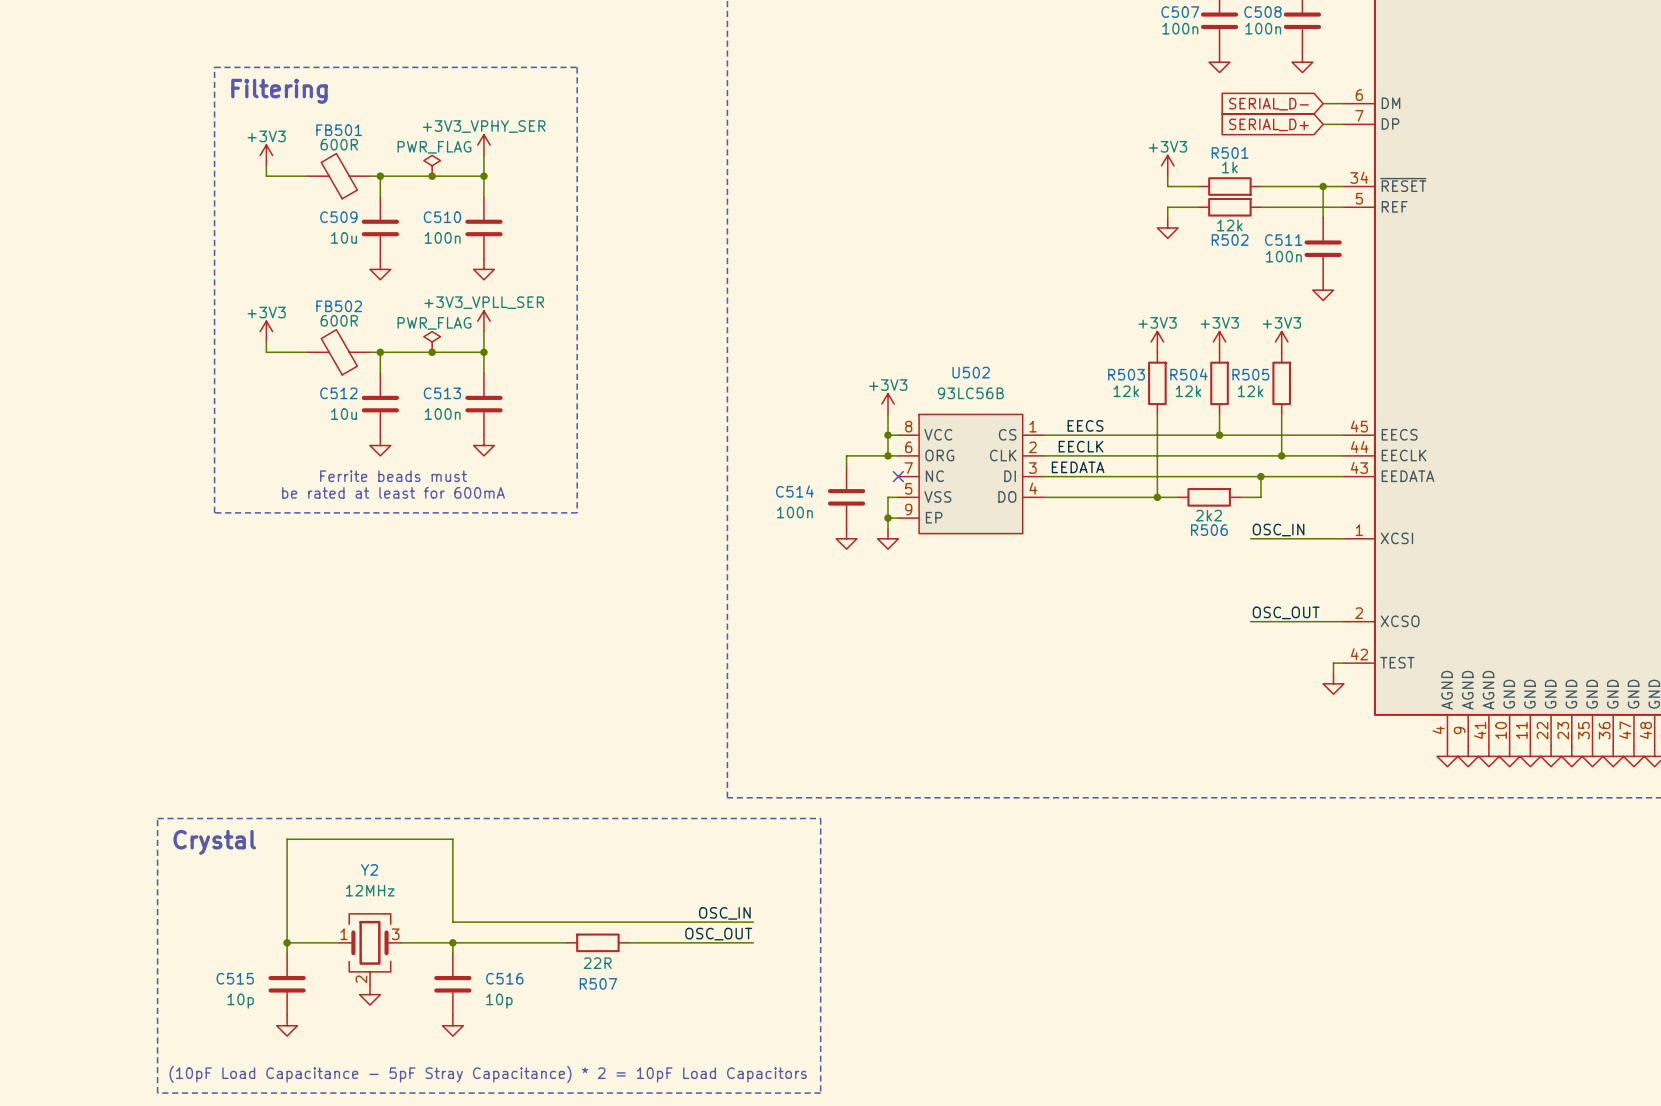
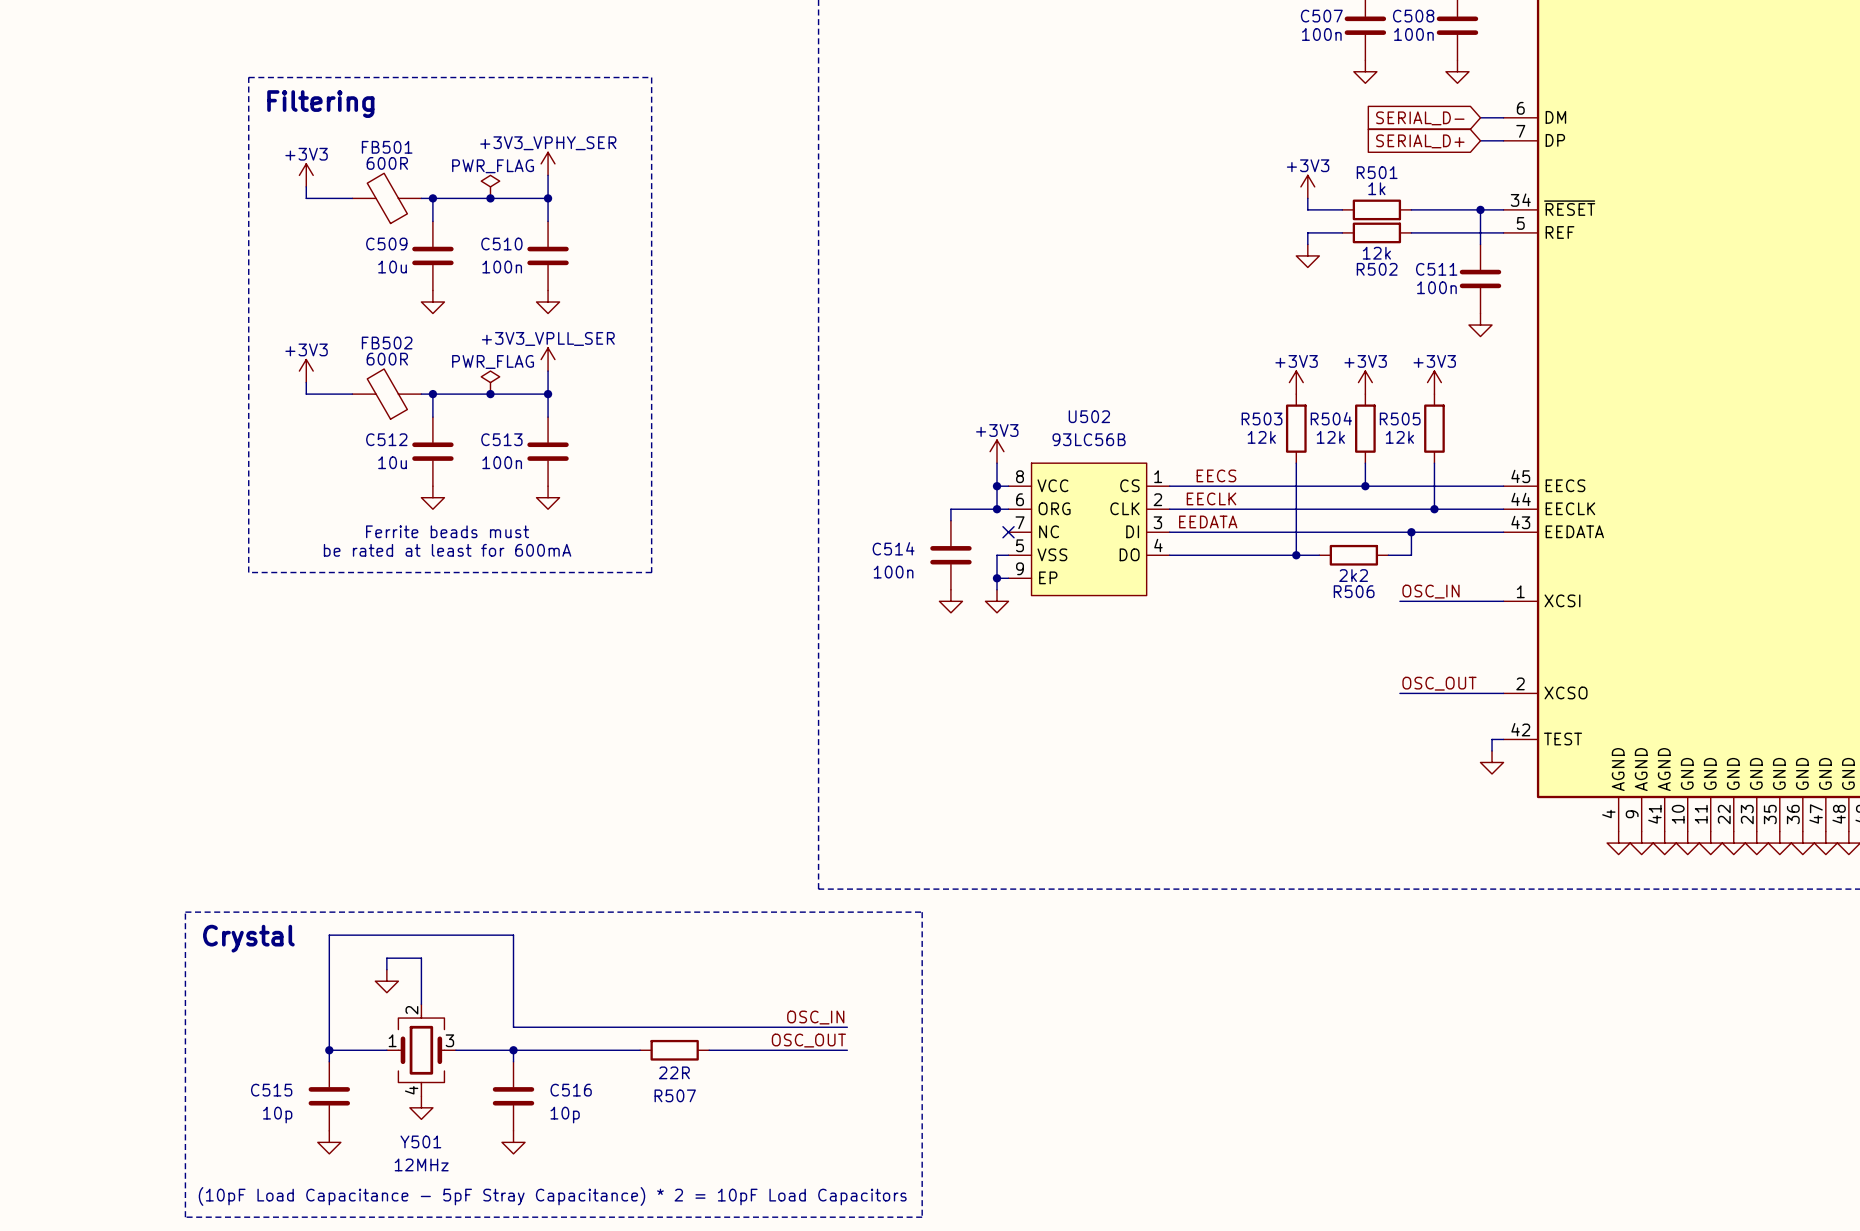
wire: none -> (386, 969) (386, 958) (421, 958) (421, 1004)
power symbol: none -> (386, 981)
Y501: none -> 12MHz (421, 1050)
Y2: 12MHz (369, 949) -> none

